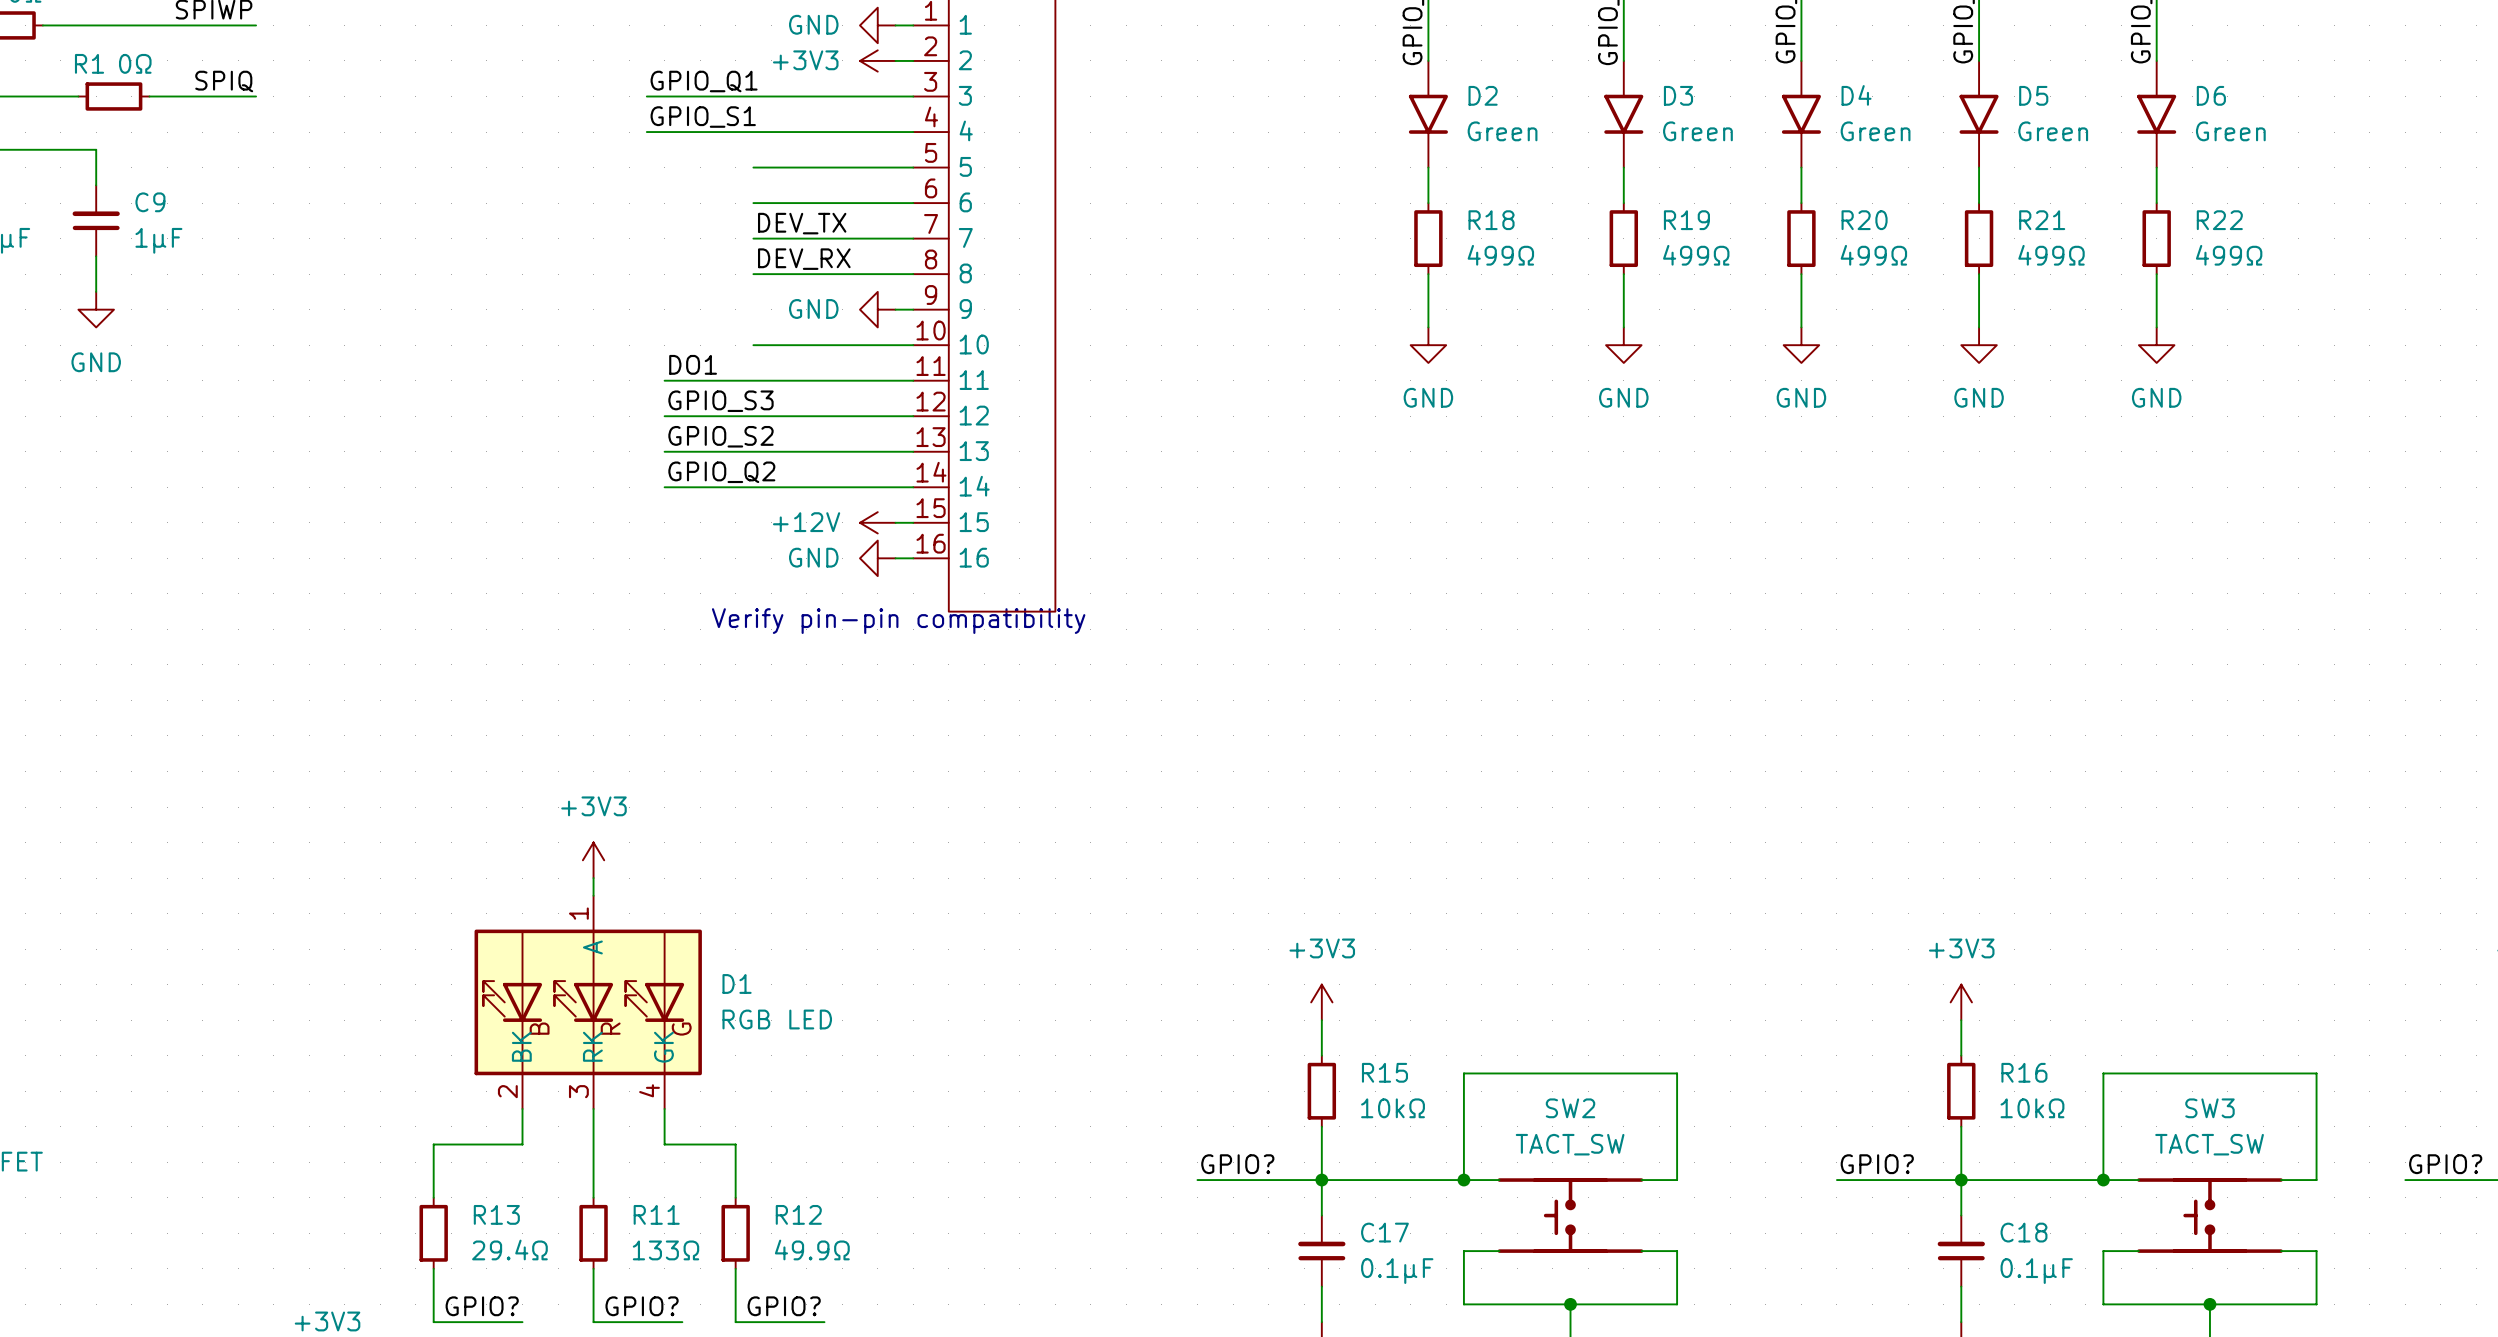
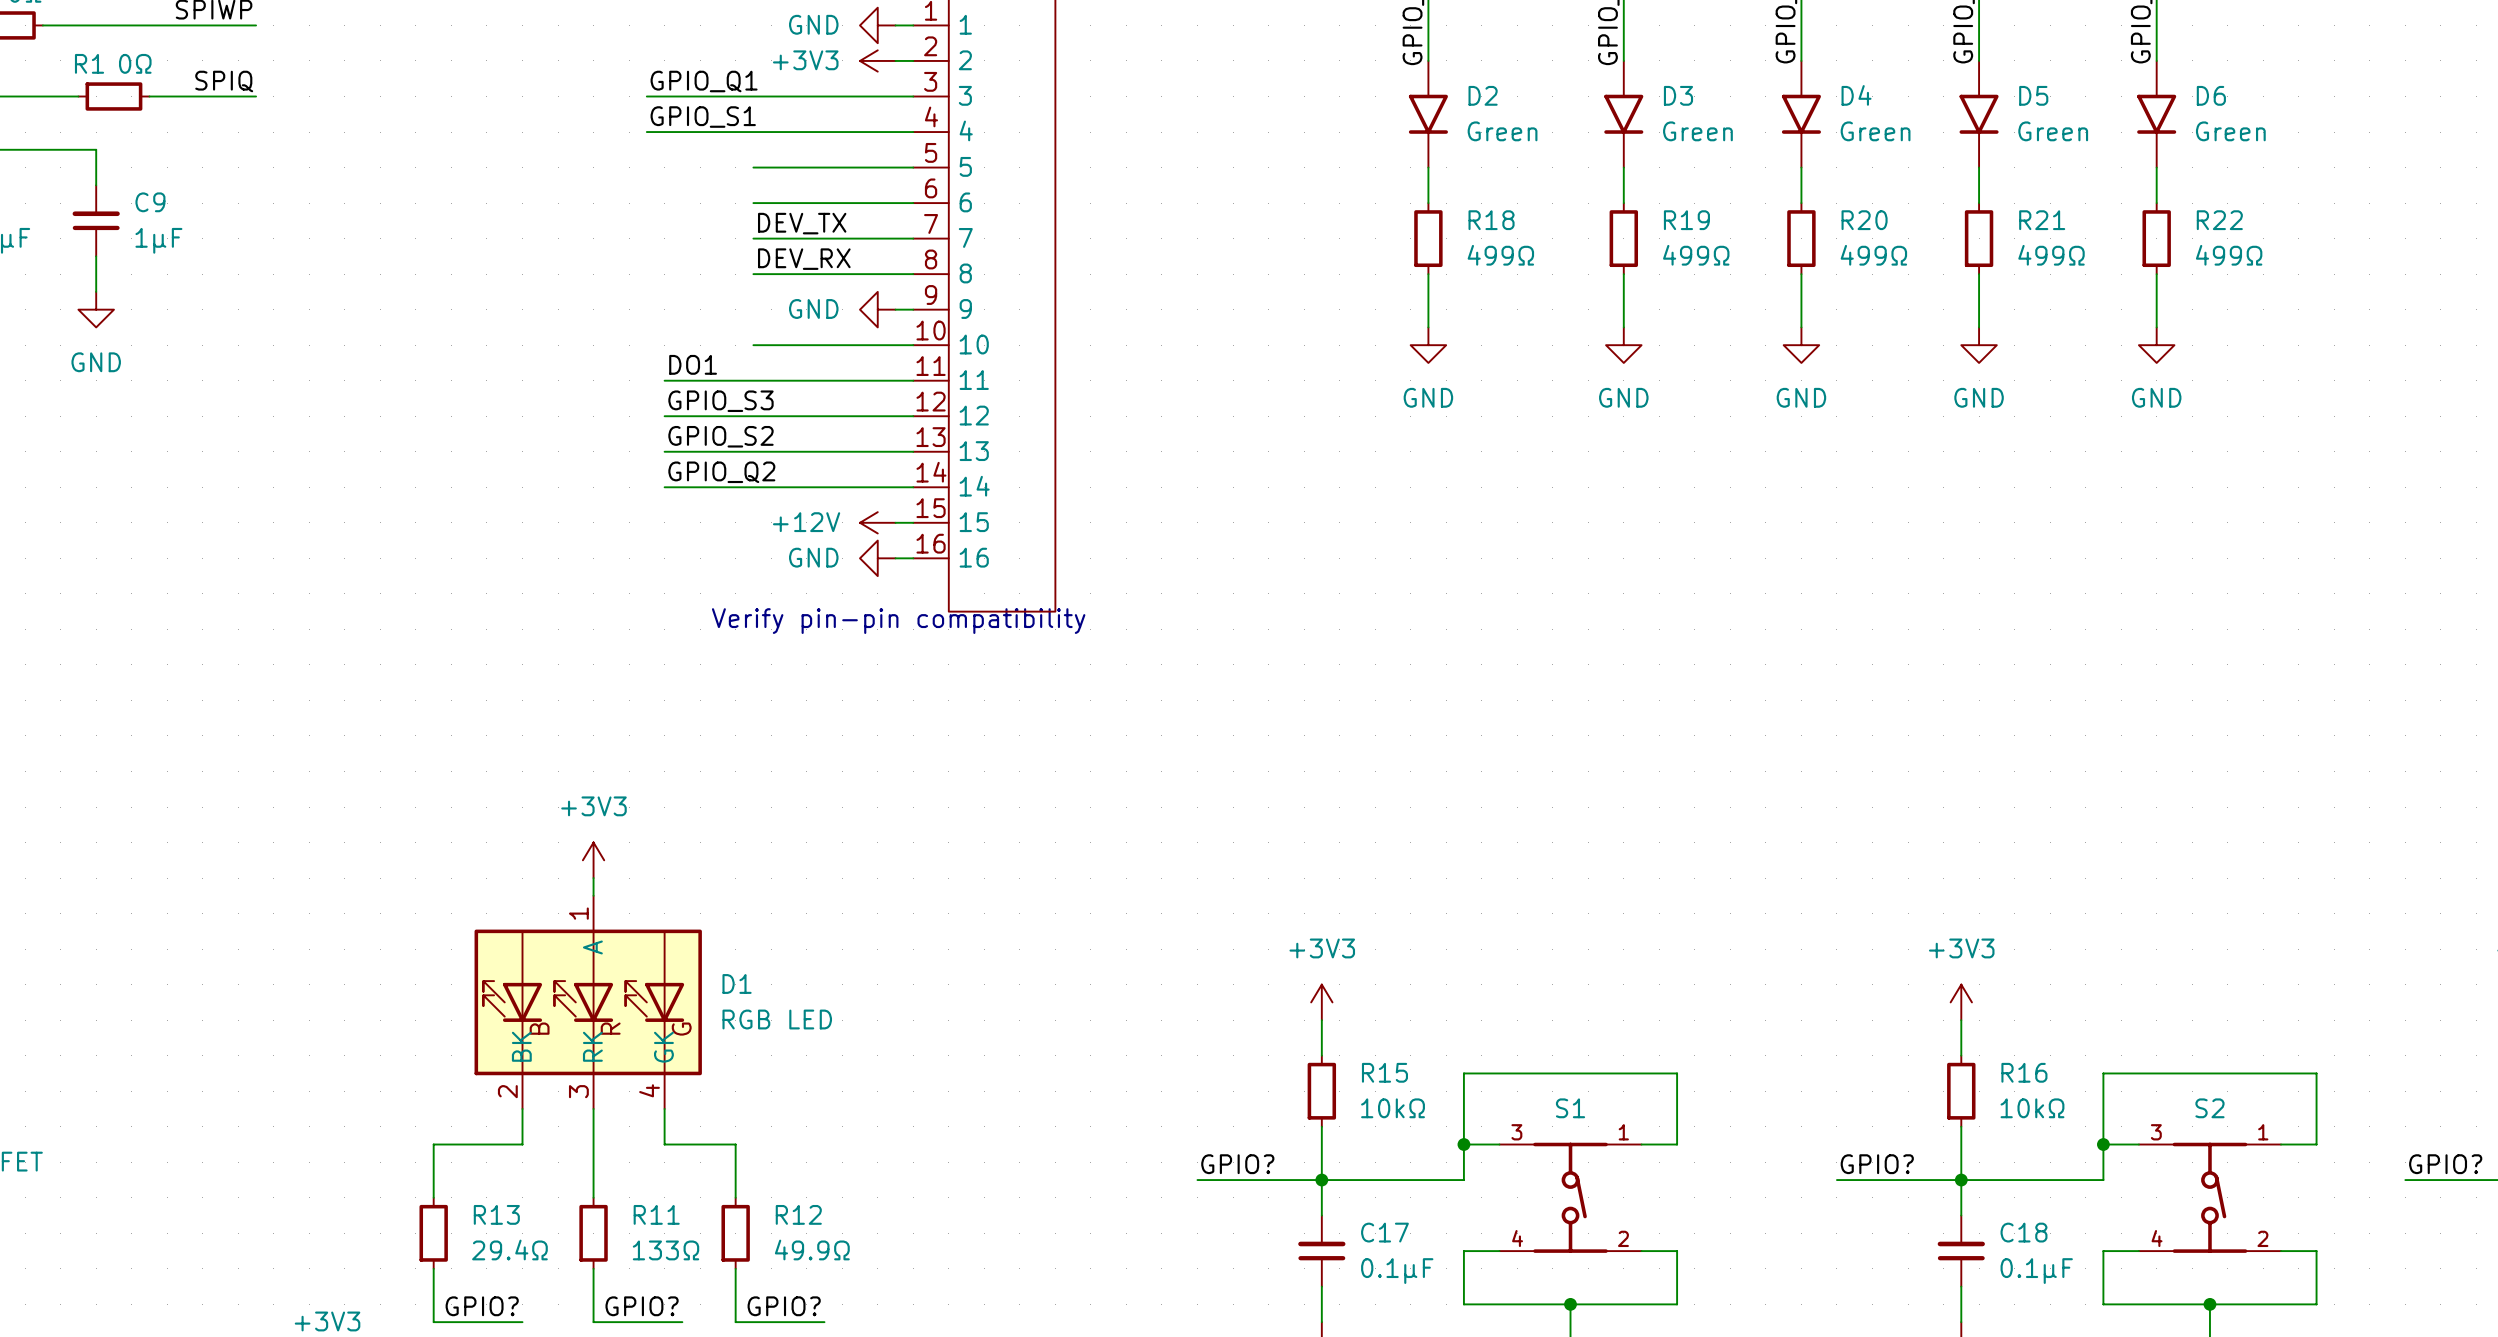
wire: (1677, 1144) (1677, 1180) (1641, 1180) -> (1677, 1144) (1641, 1144)
wire: (2316, 1144) (2316, 1180) (2281, 1180) -> (2316, 1144) (2281, 1144)
wire: (1463, 1180) (1499, 1180) -> (1463, 1144) (1499, 1144)
junction position: (1463, 1180) -> (1463, 1144)
wire: (2103, 1180) (2138, 1180) -> (2103, 1144) (2138, 1144)
junction position: (2103, 1180) -> (2103, 1144)
S1: none -> (1570, 1197)
S2: none -> (2209, 1197)
SW2: (1570, 1215) -> none
SW3: (2209, 1215) -> none

